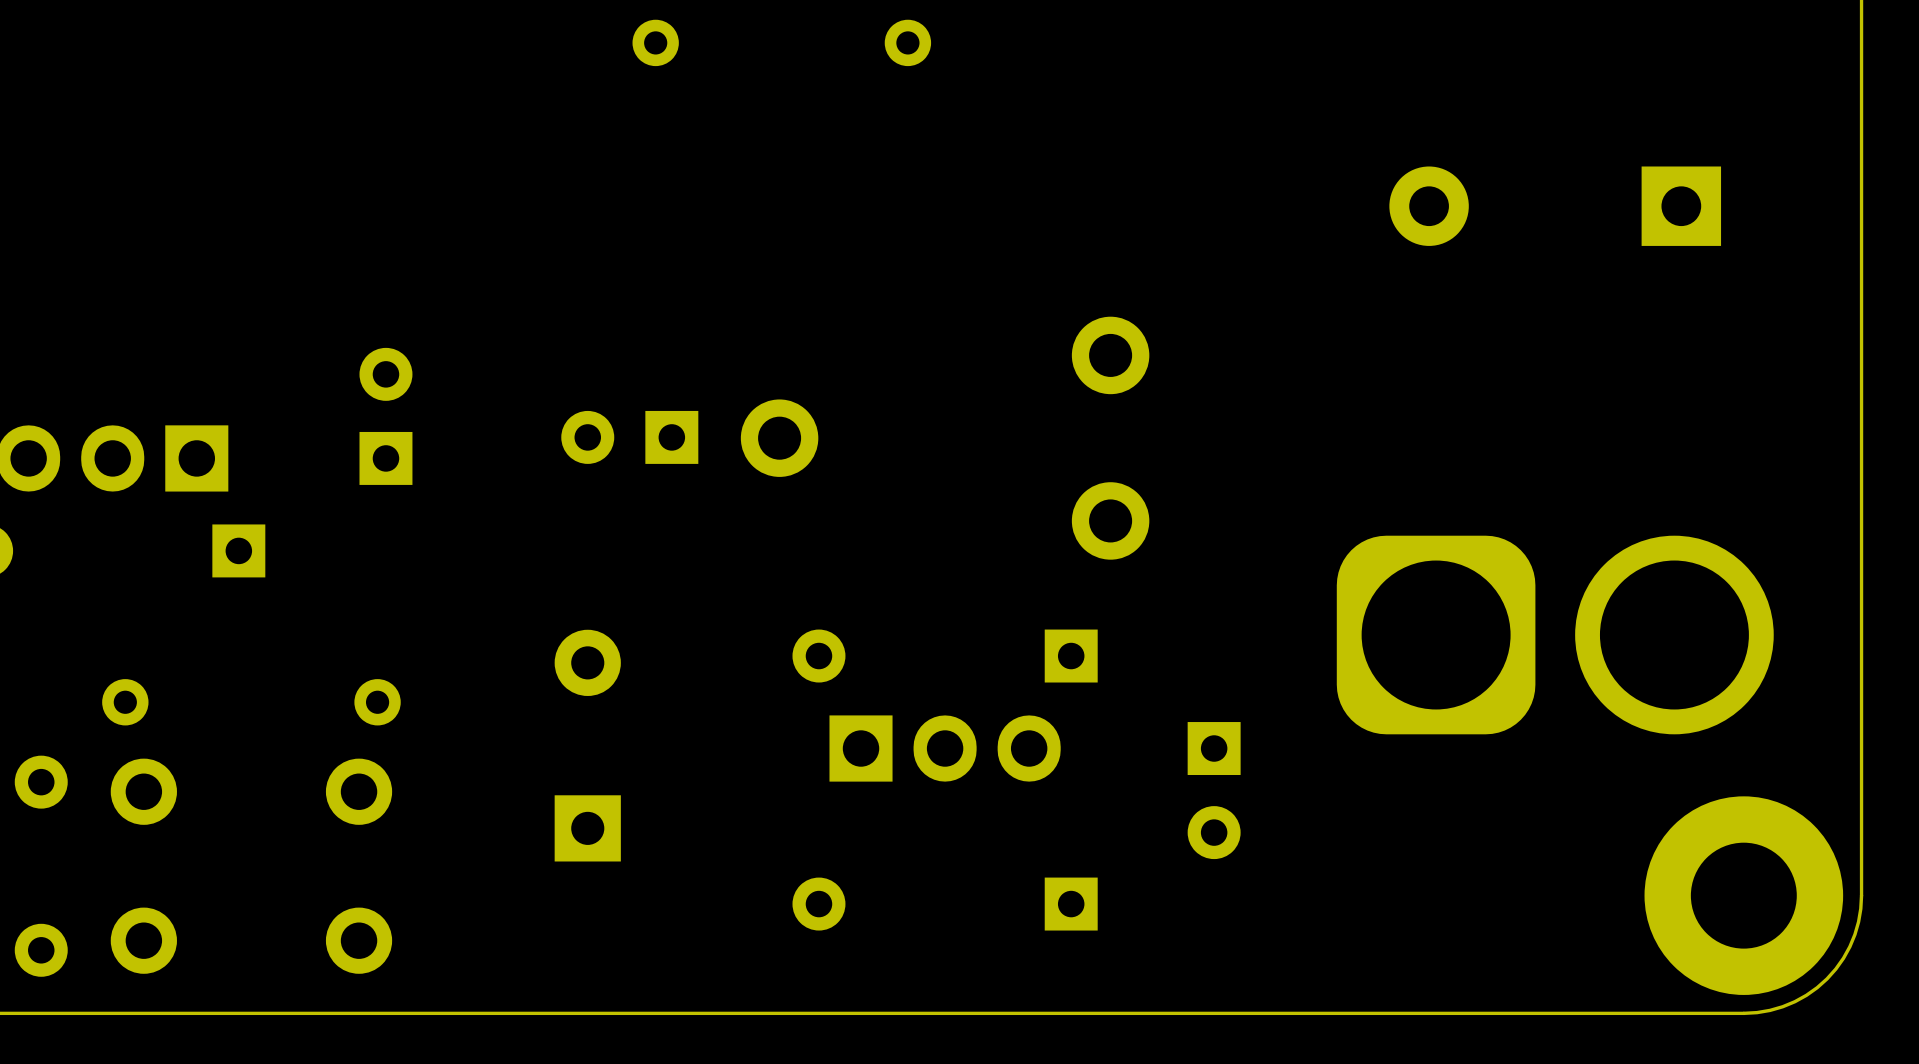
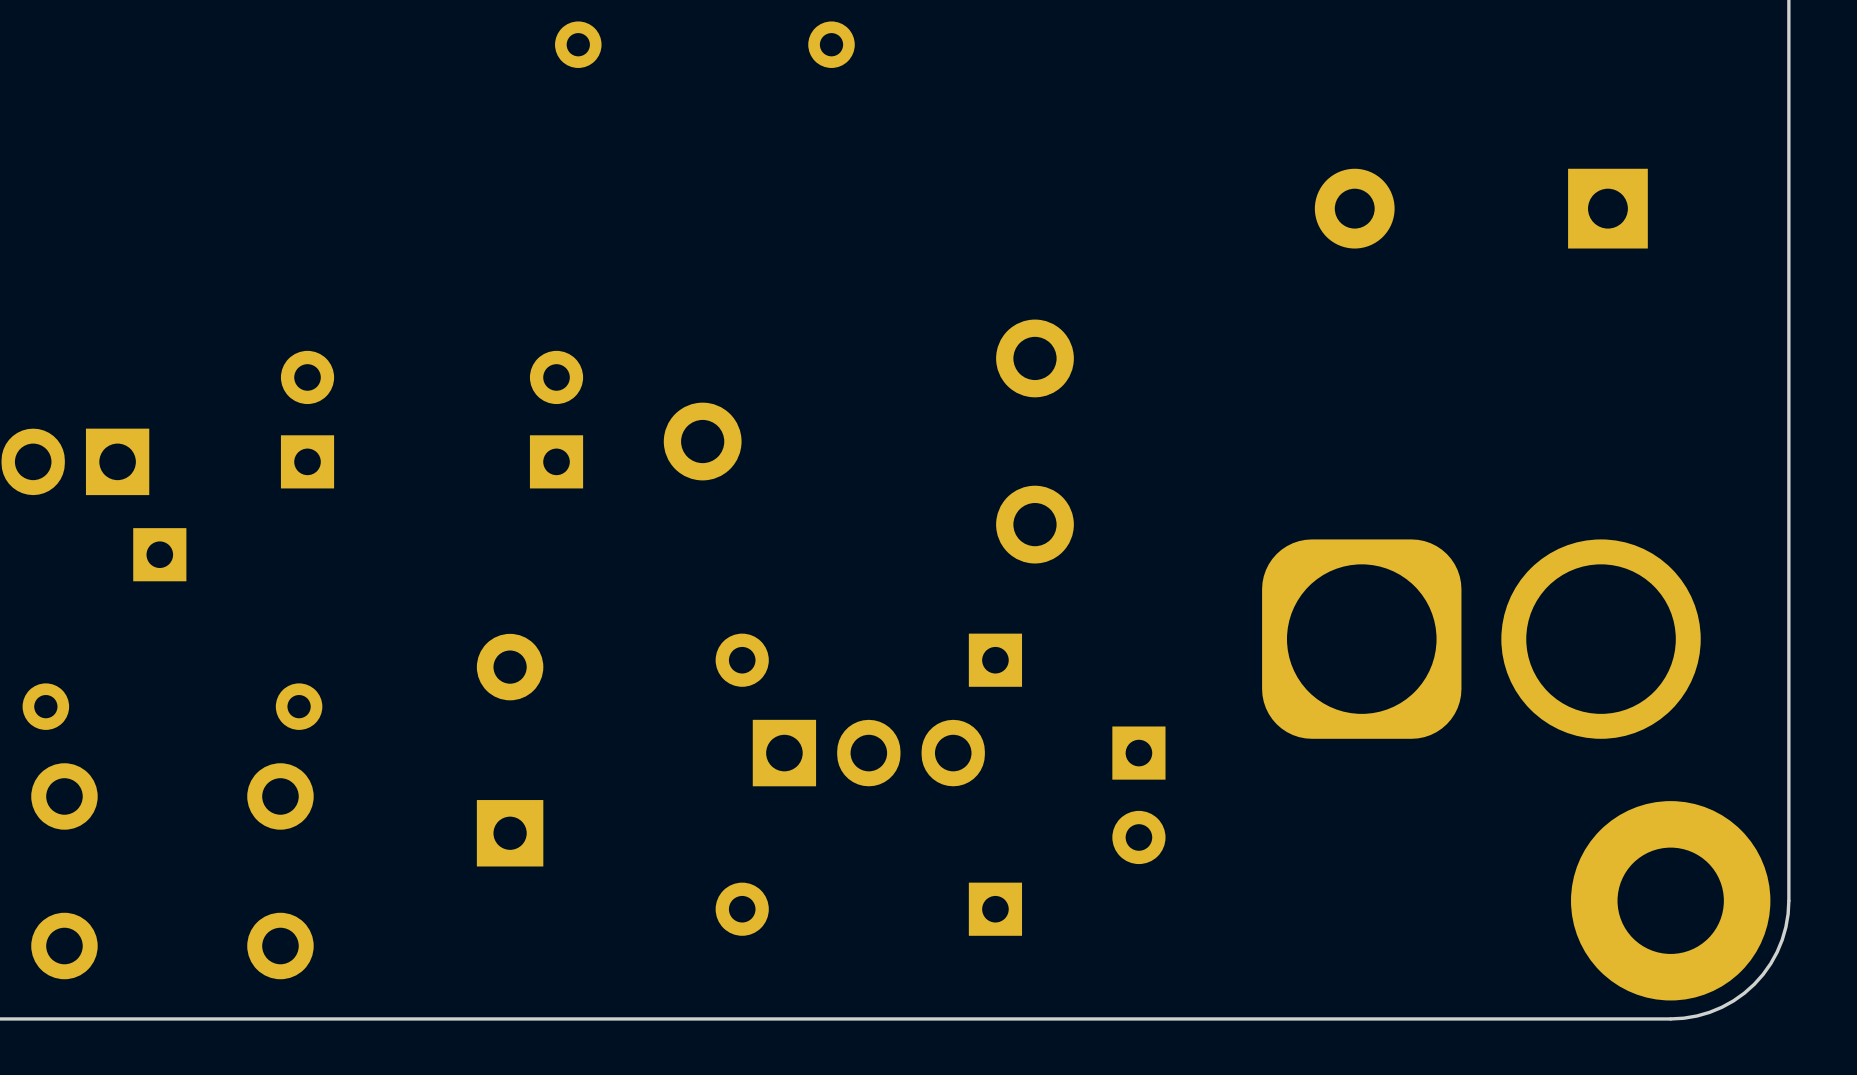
part rotation: 0° (629, 437) -> 90° clockwise (556, 419)

